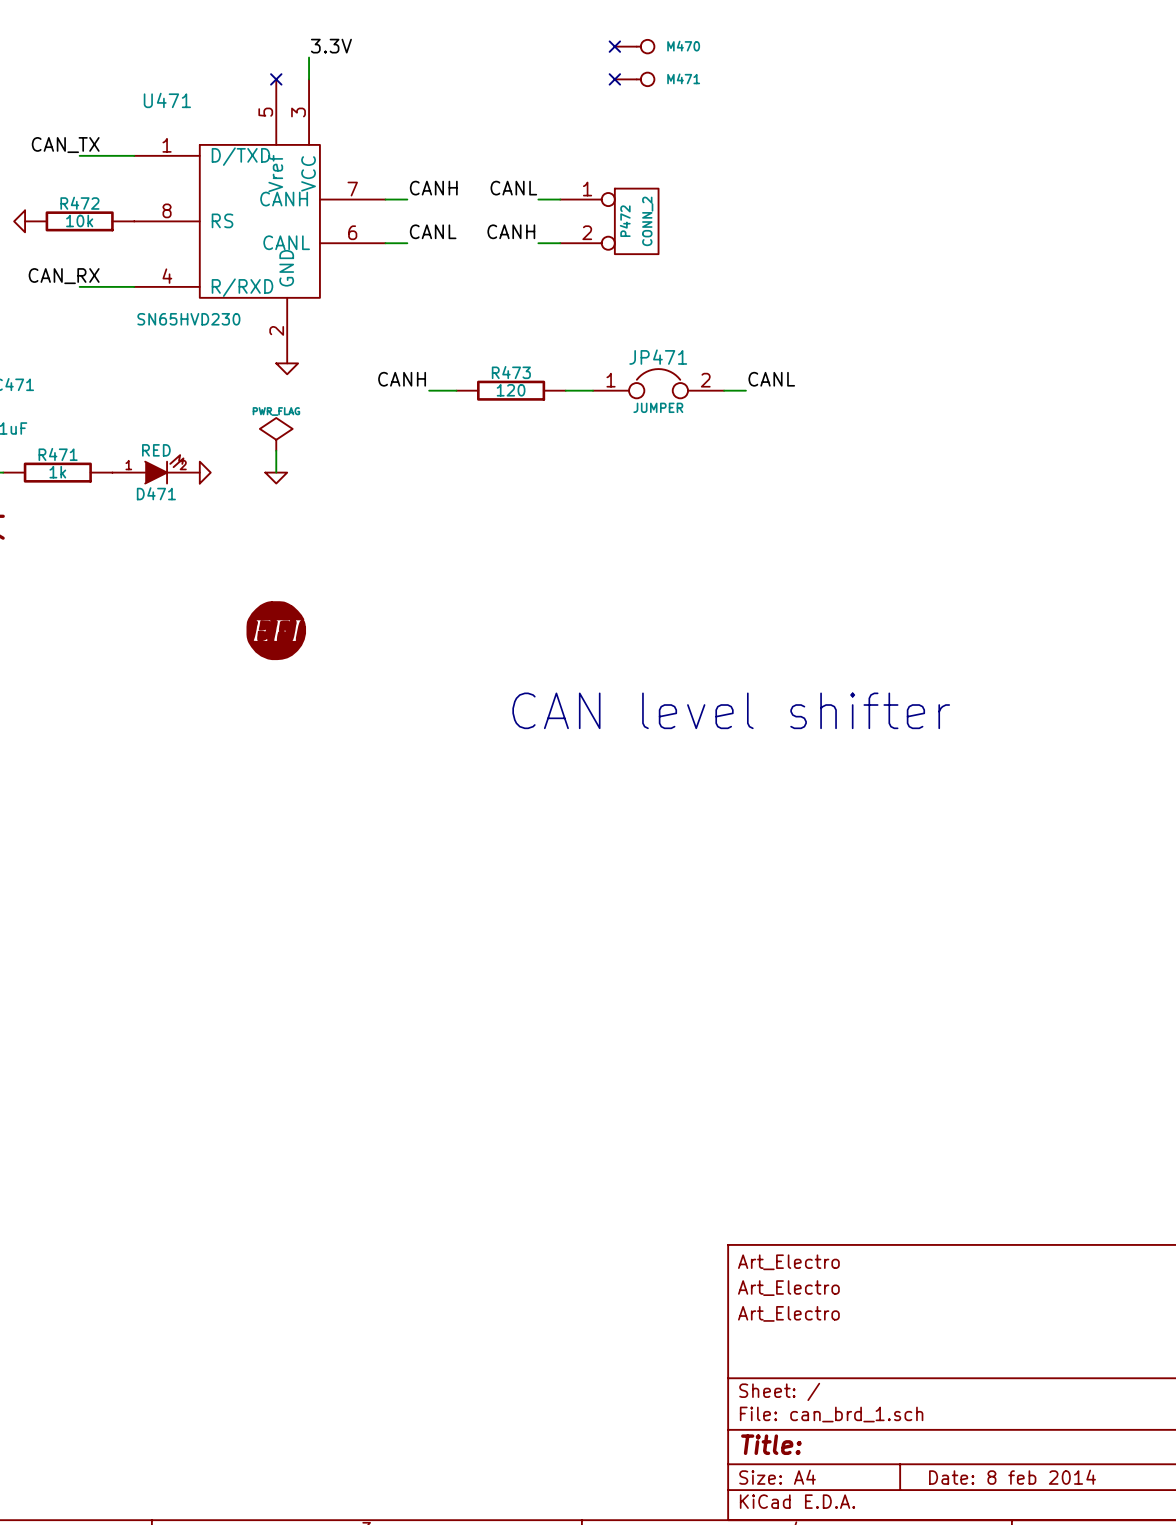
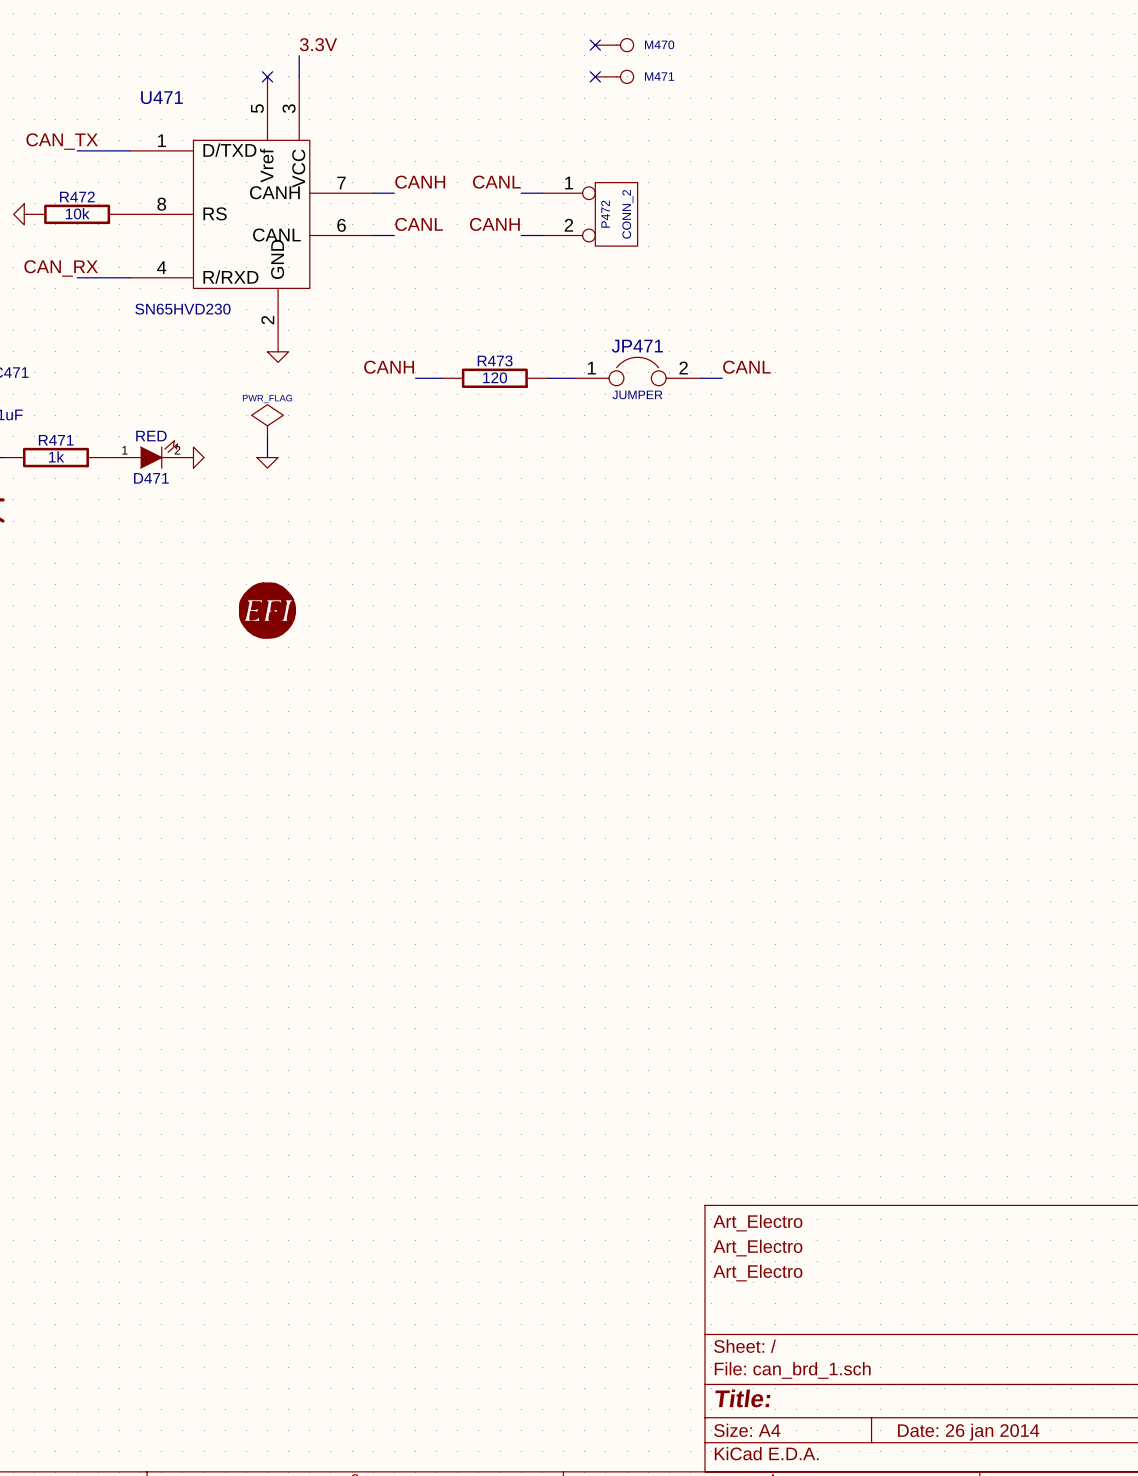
text: CAN level shifter (731, 710) -> none
title block: Date: 8 feb 2014 (1012, 1477) -> Date: 26 jan 2014 (968, 1432)

